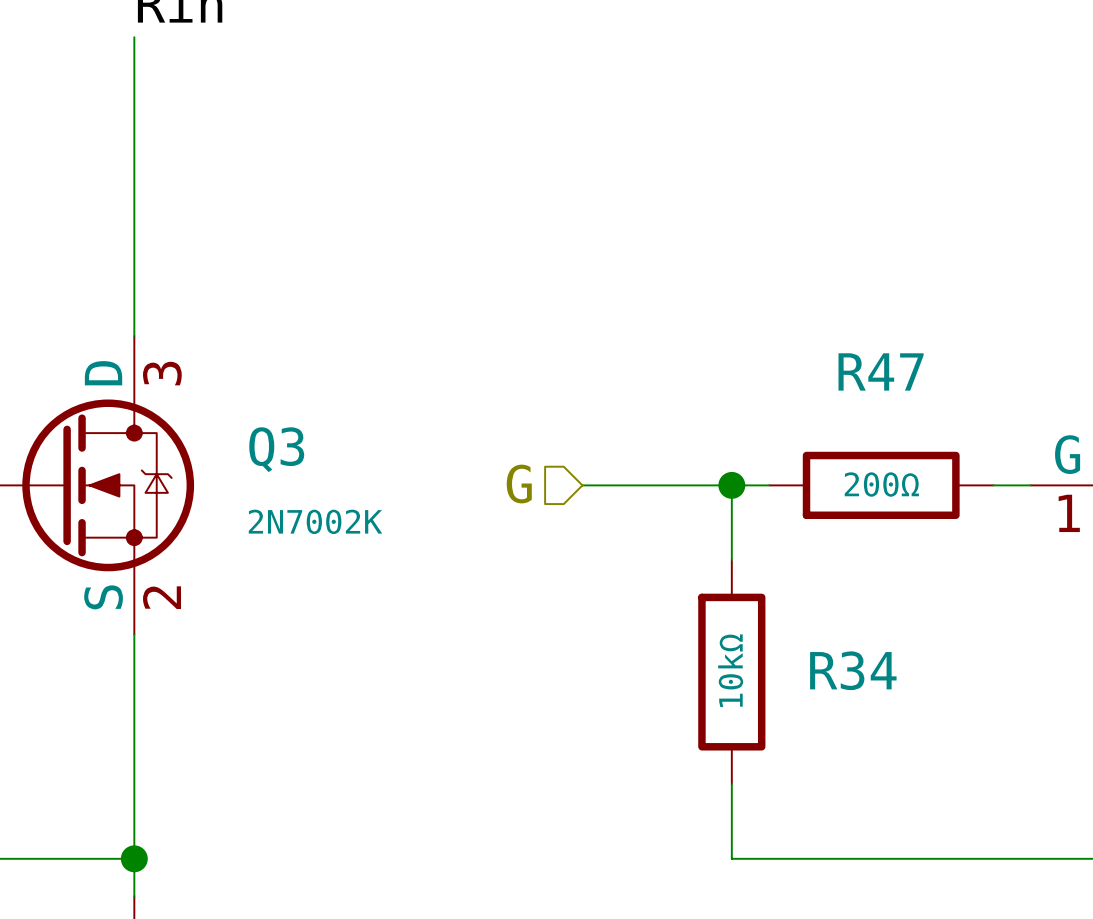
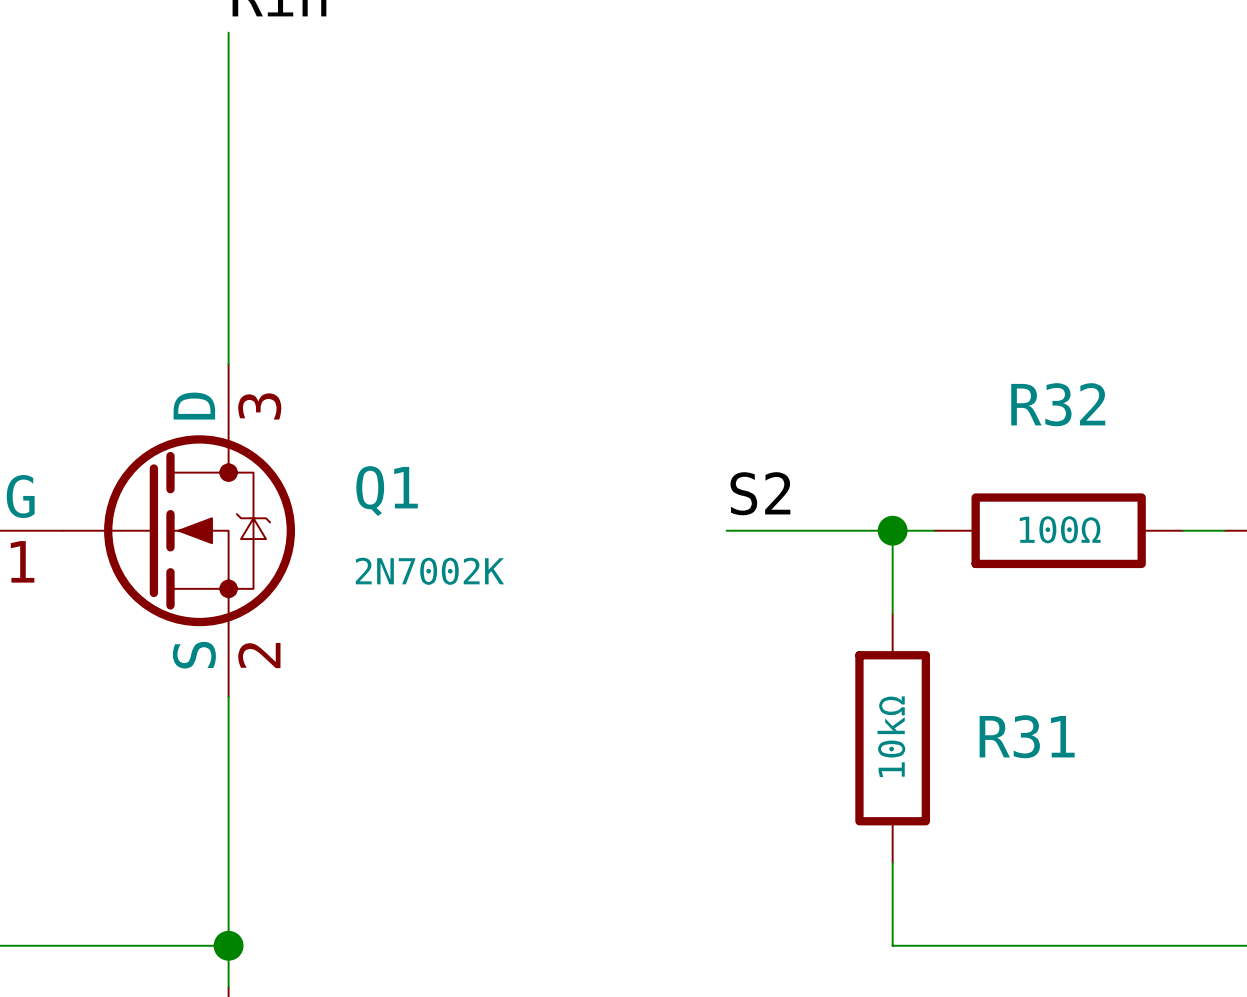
R47 name: R47 (881, 371) -> R32 (1058, 404)
Q3 name: Q3 (276, 449) -> Q1 (387, 491)
label: none -> S2 (760, 493)
hierarchical label: G (519, 484) -> none
R47 value: 200Ω (881, 484) -> 100Ω (1060, 529)
R34 name: R34 (853, 670) -> R31 (1027, 736)

